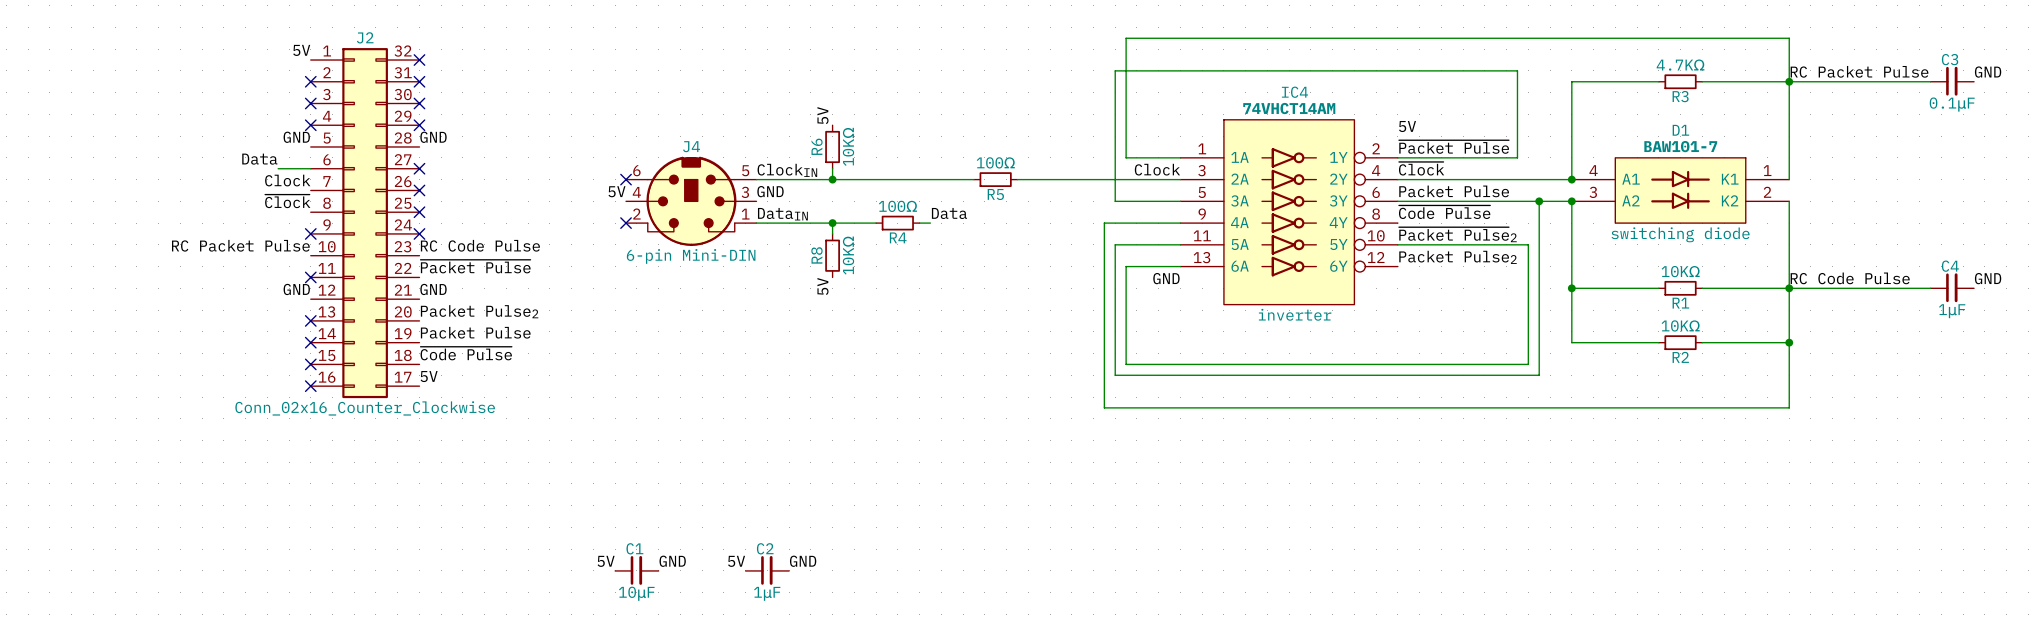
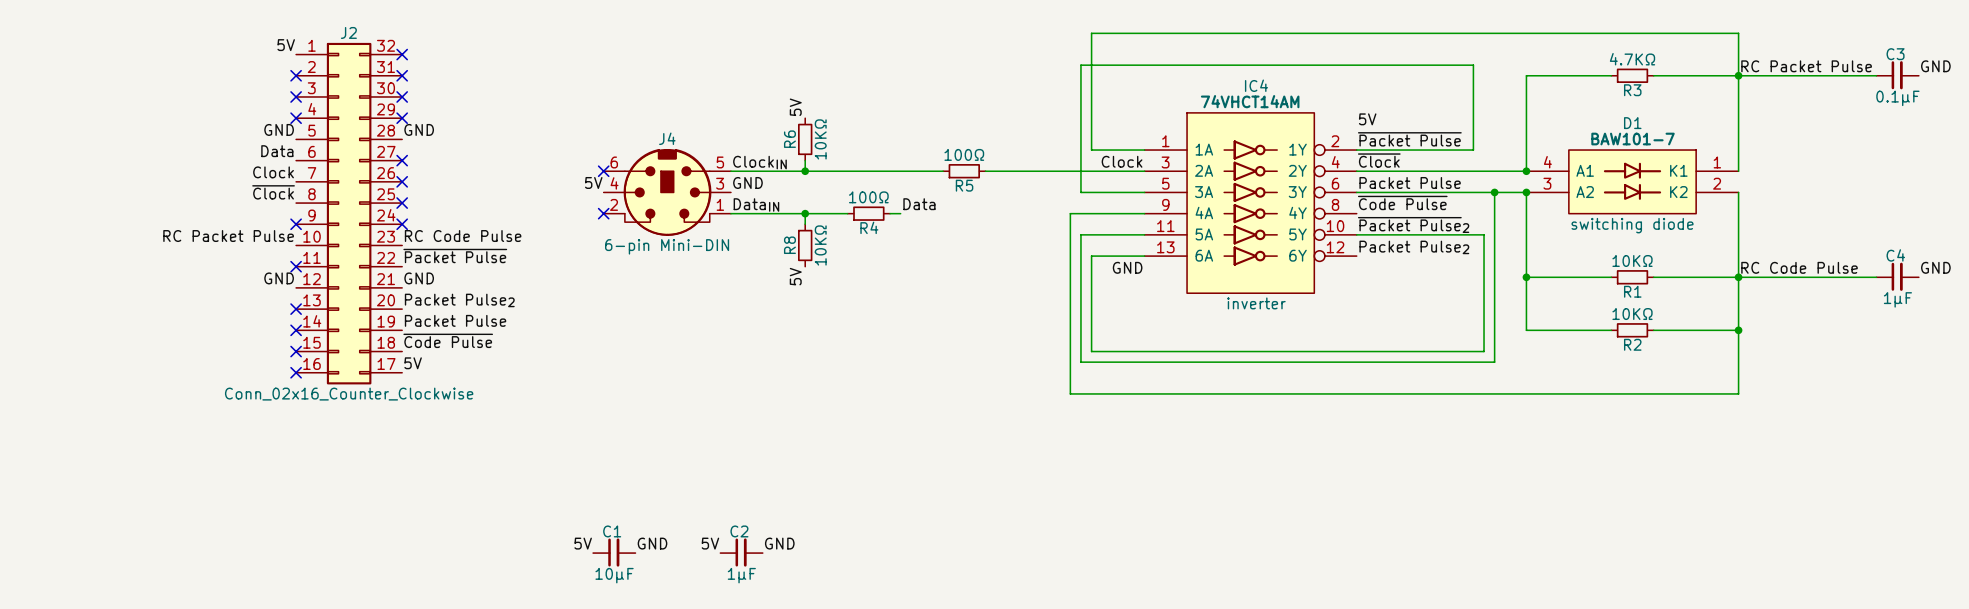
label position: Data (259, 159) -> Data (277, 151)
wire: (278, 168) (310, 168) -> none

